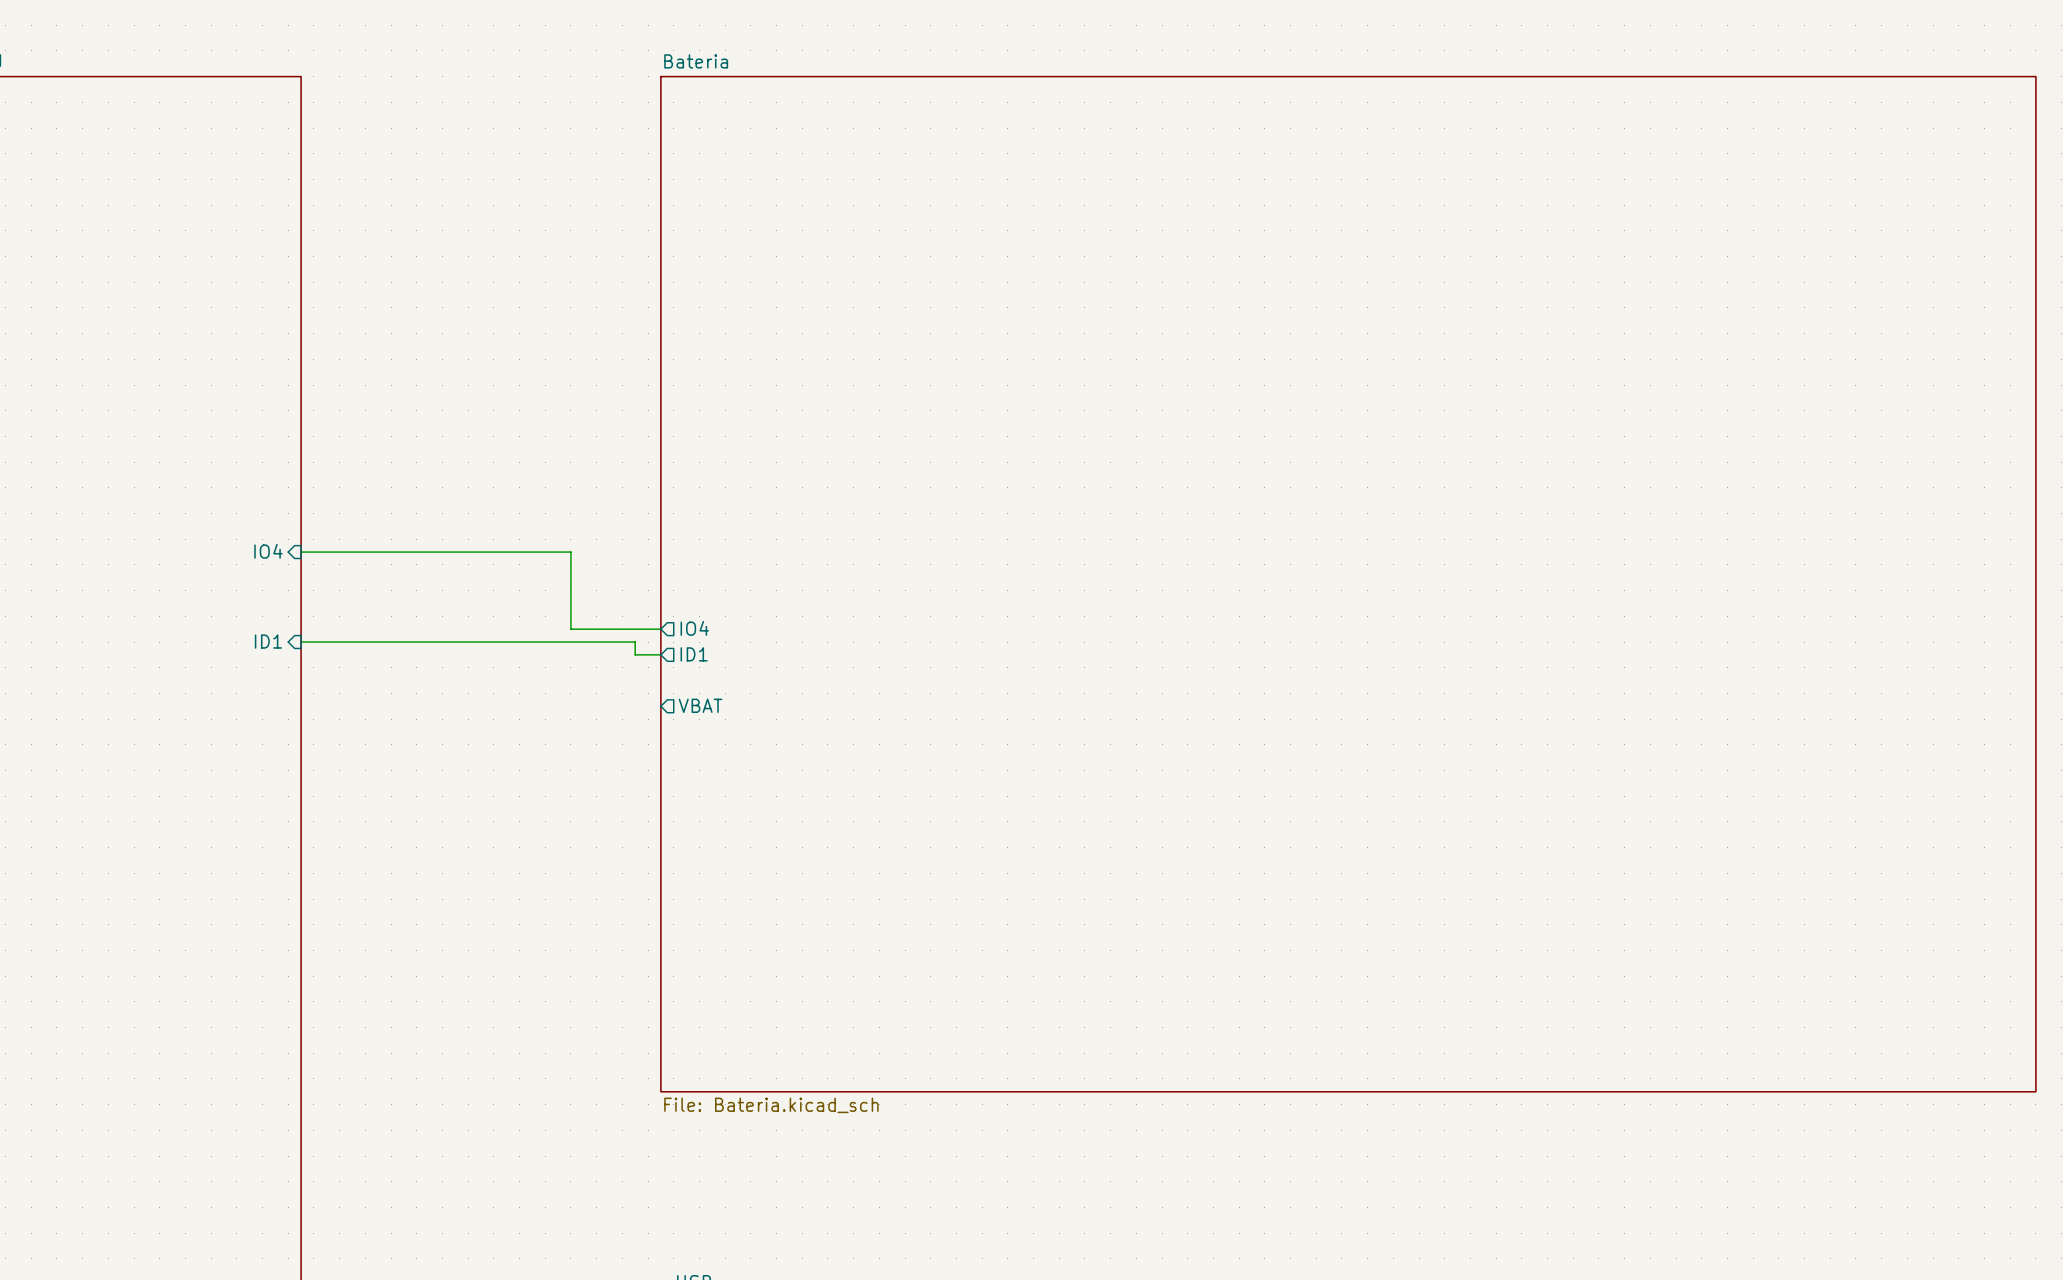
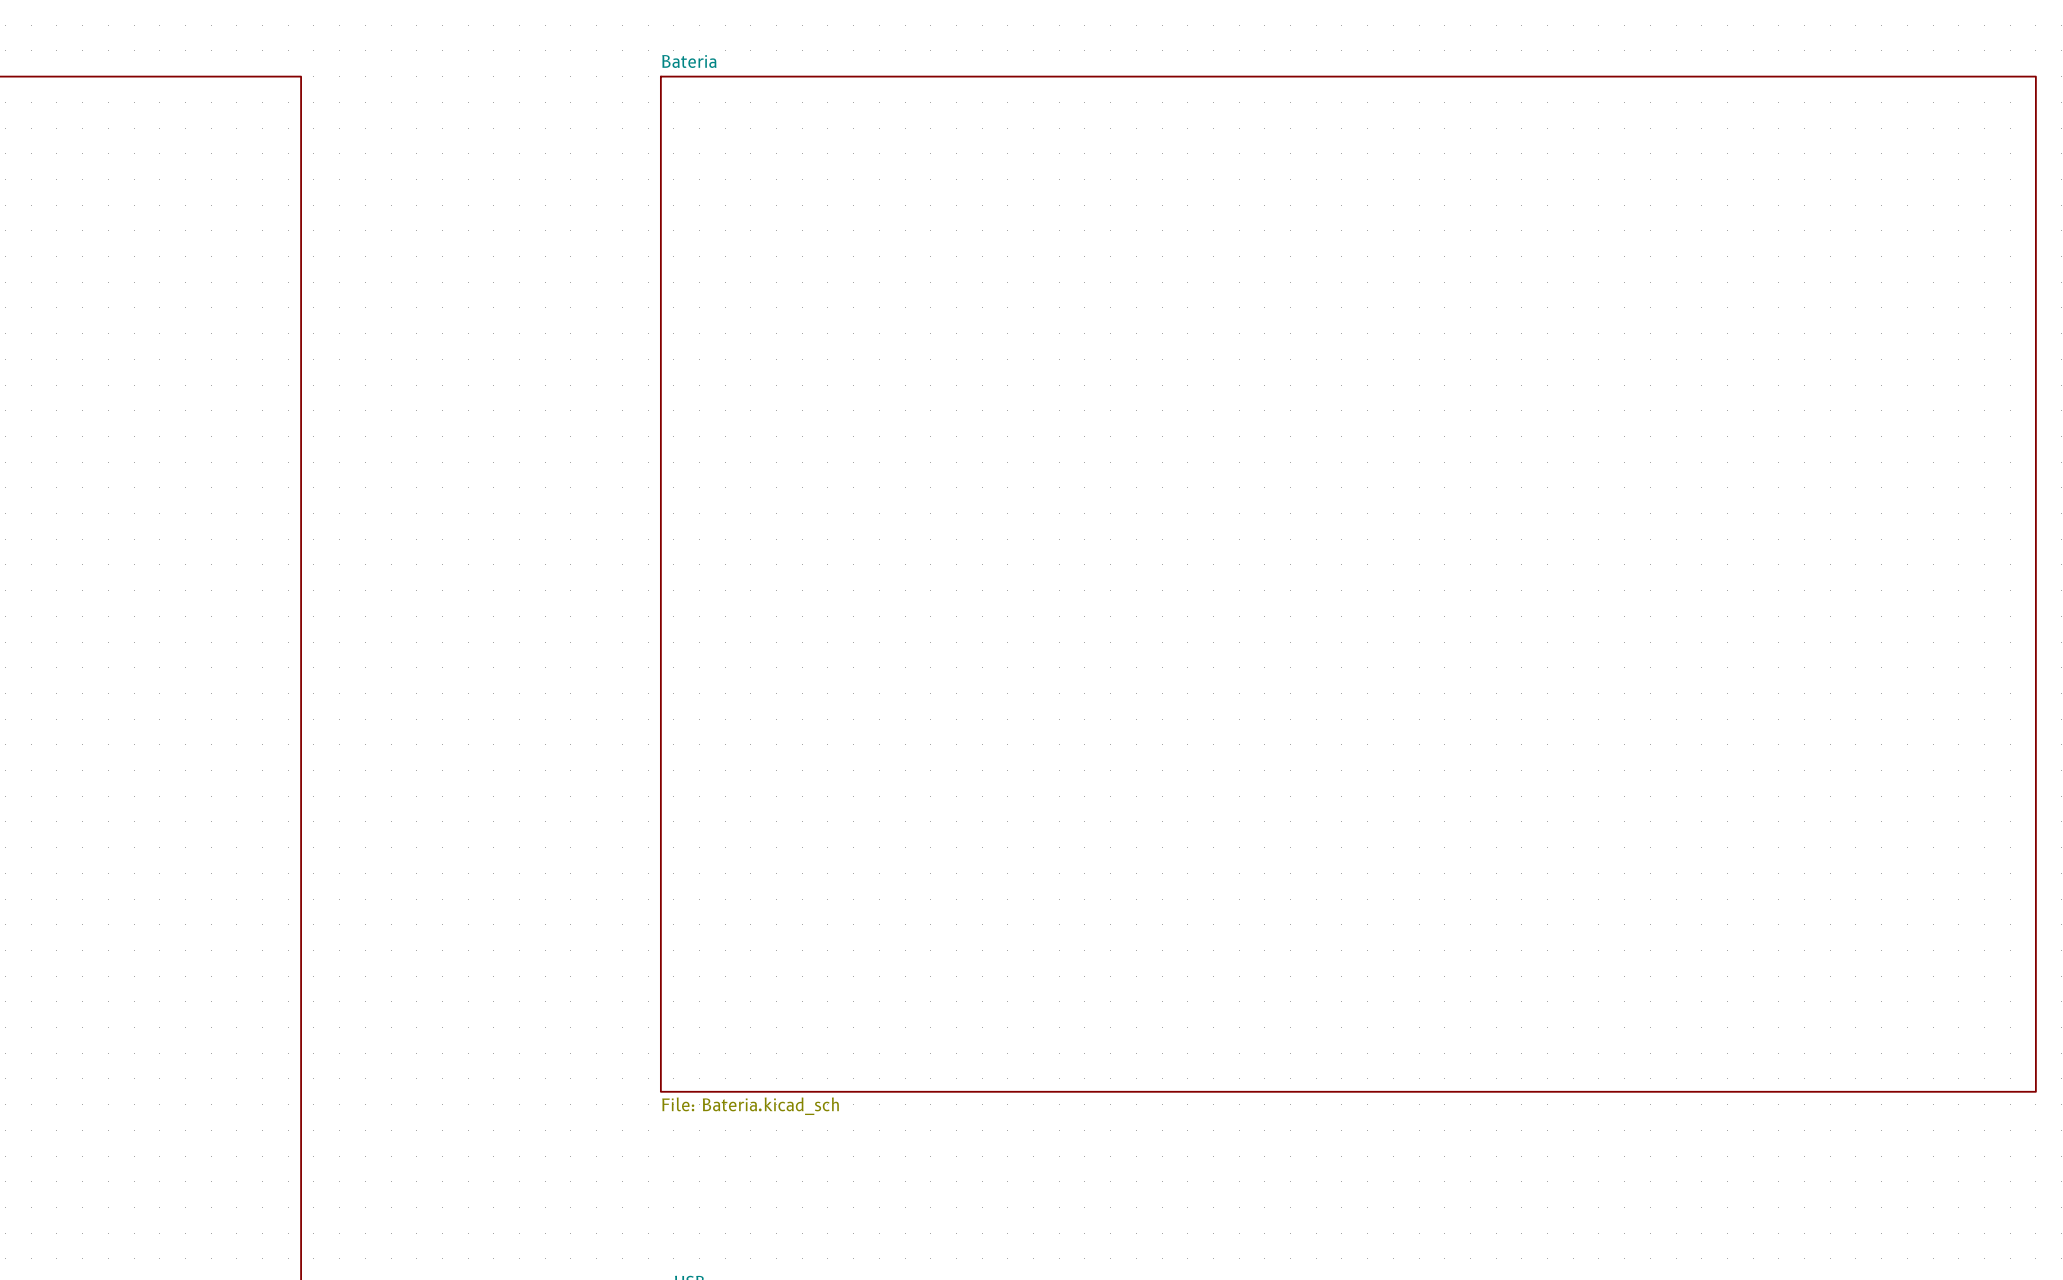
sheet pin: IO4 (268, 551) -> none
wire: (301, 552) (570, 552) (570, 629) (660, 629) -> none
sheet pin: IO4 (694, 628) -> none
sheet pin: ID1 (268, 641) -> none
wire: (301, 642) (635, 642) (635, 654) (660, 654) -> none
sheet pin: ID1 (694, 654) -> none
sheet pin: VBAT (700, 705) -> none

